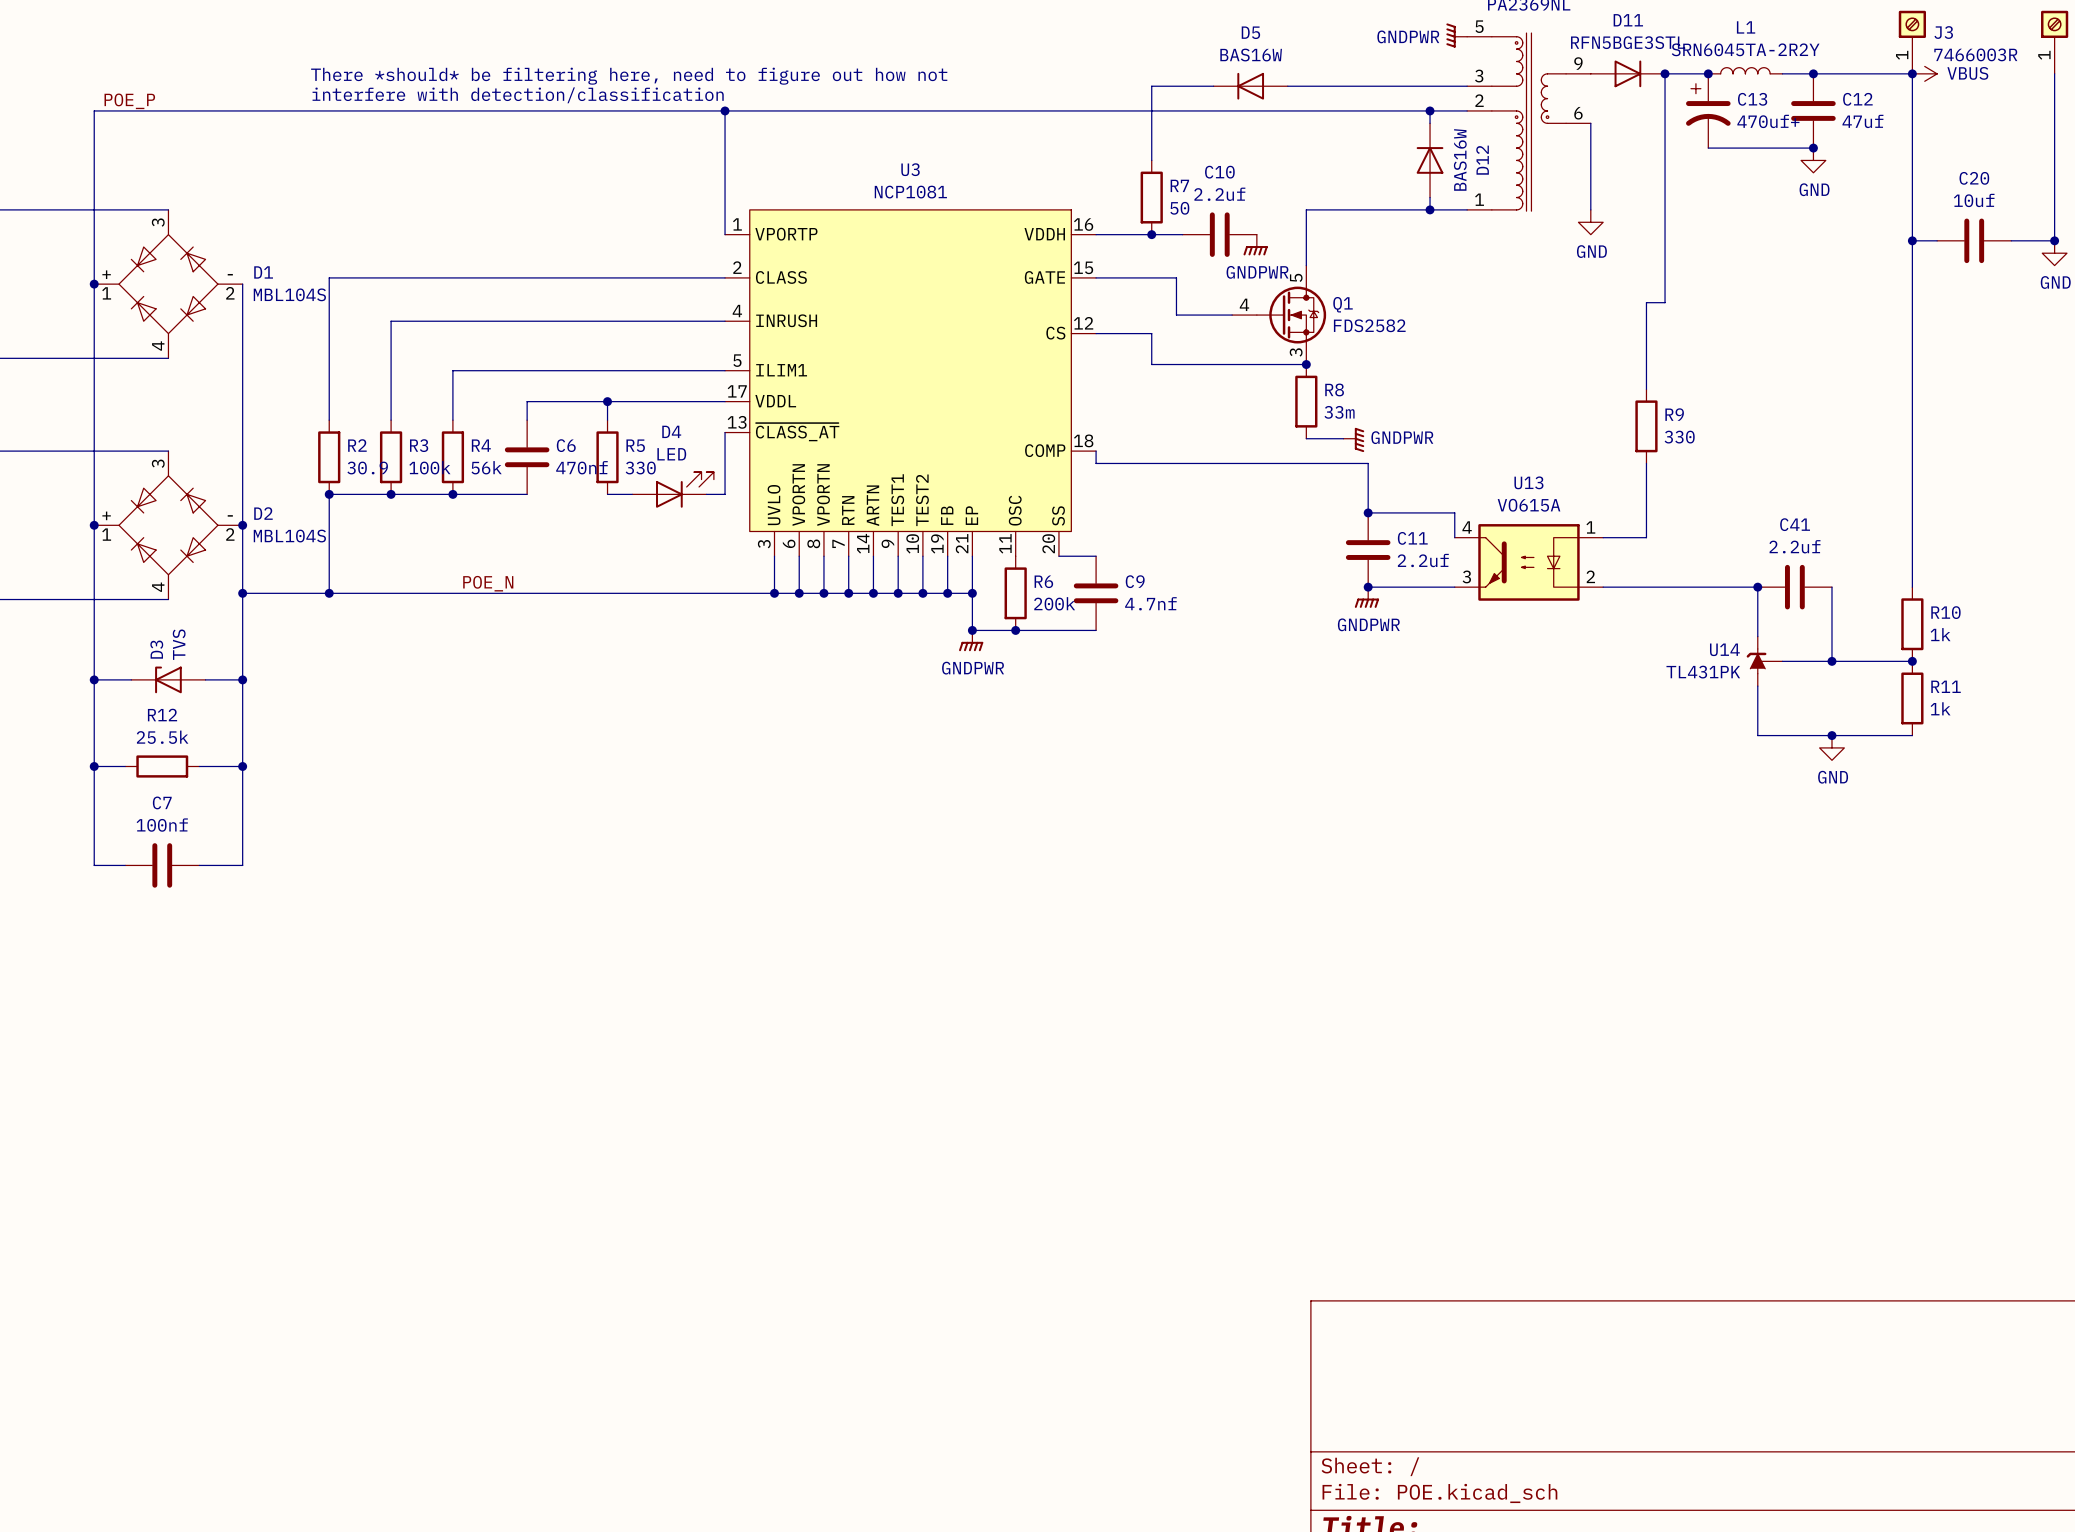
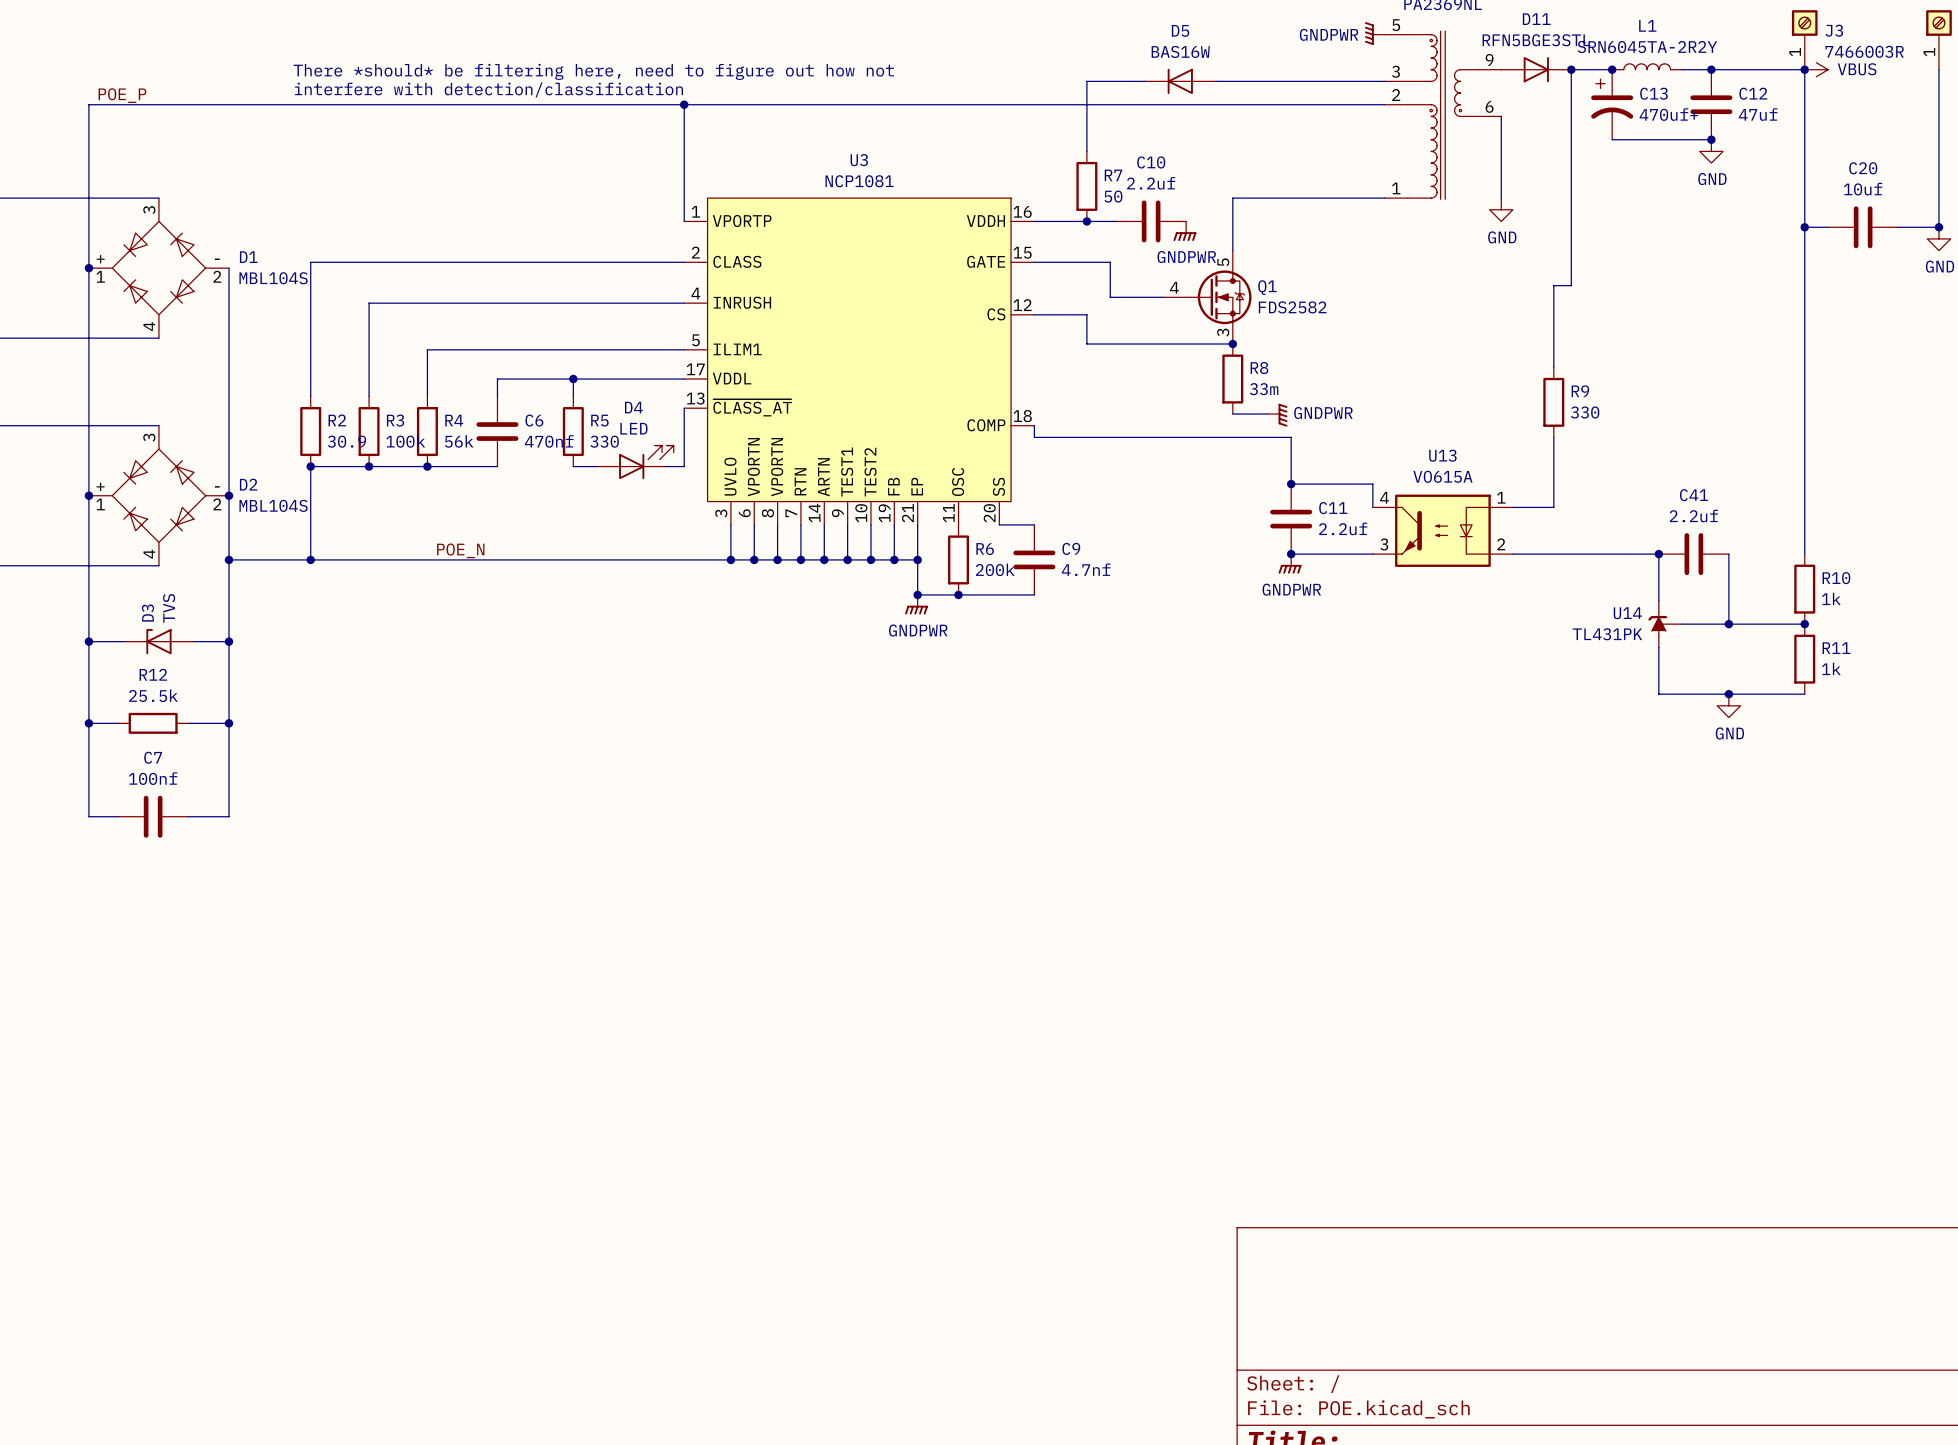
wire: (1430, 110) (1430, 123) -> none
junction: (1430, 110) -> none
D12: BAS16W (1430, 160) -> none
wire: (1430, 197) (1430, 209) -> none
junction: (1430, 209) -> none

